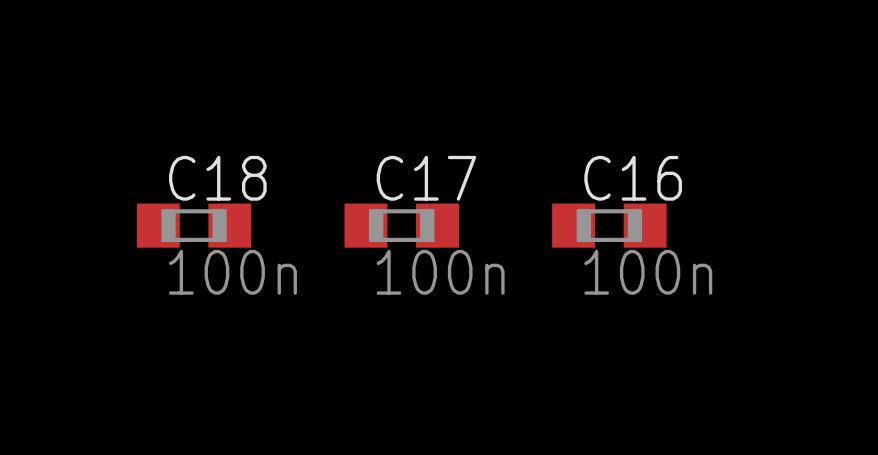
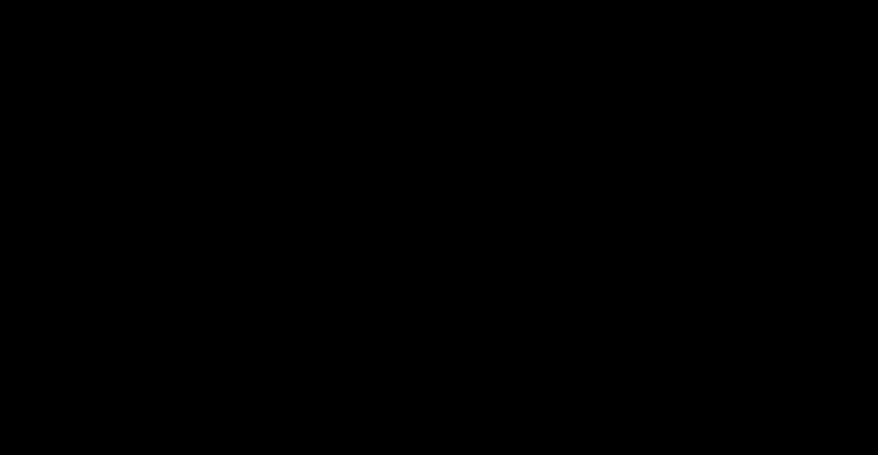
C18: 100n (194, 225) -> none
C17: 100n (401, 225) -> none
C16: 100n (609, 225) -> none

